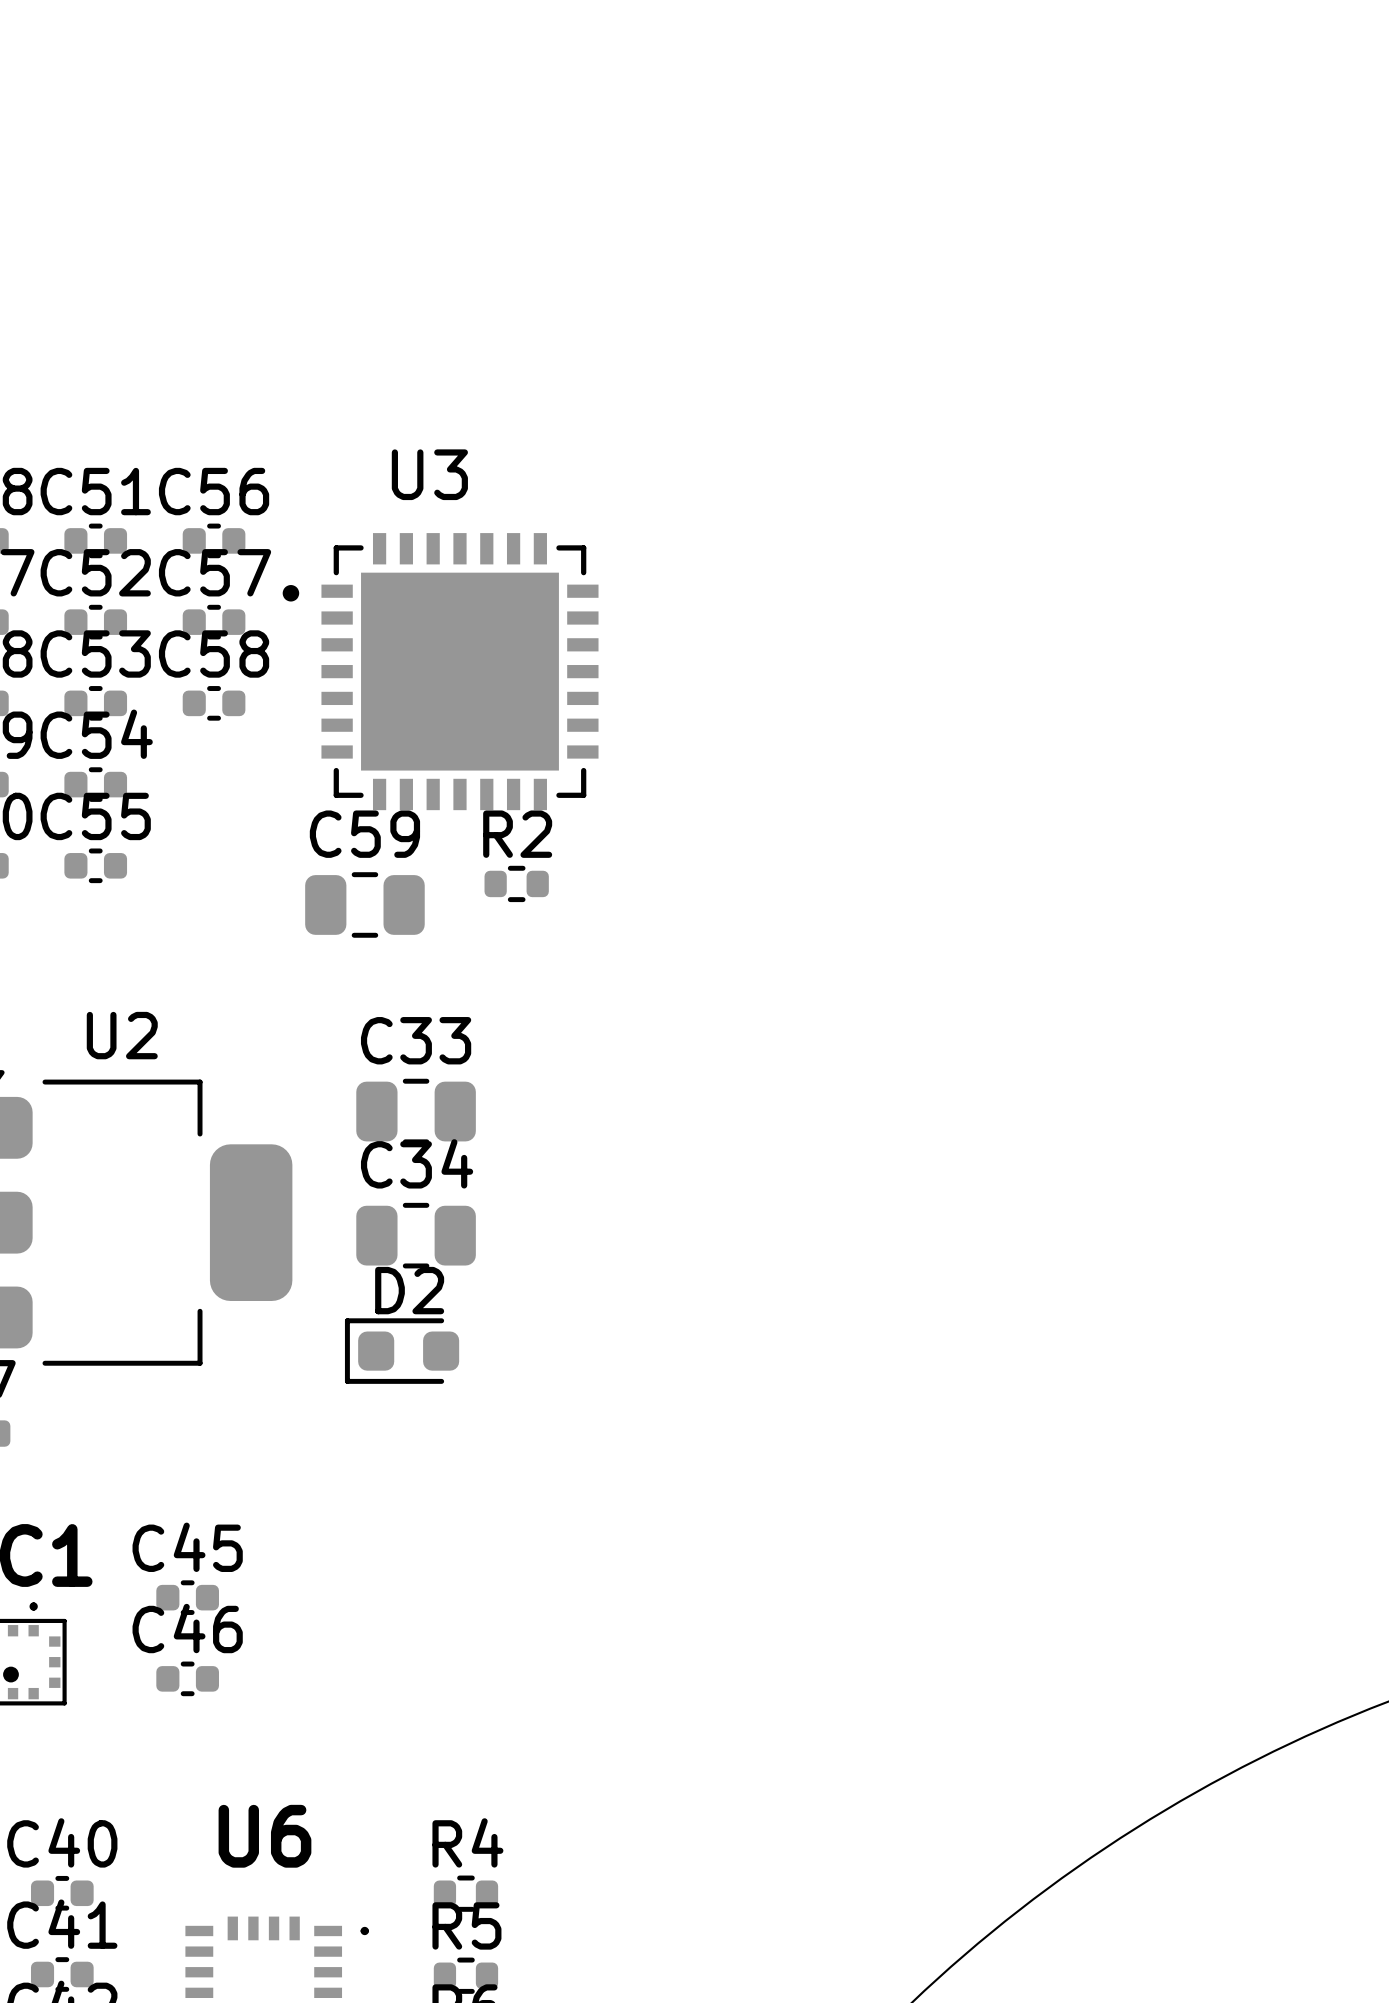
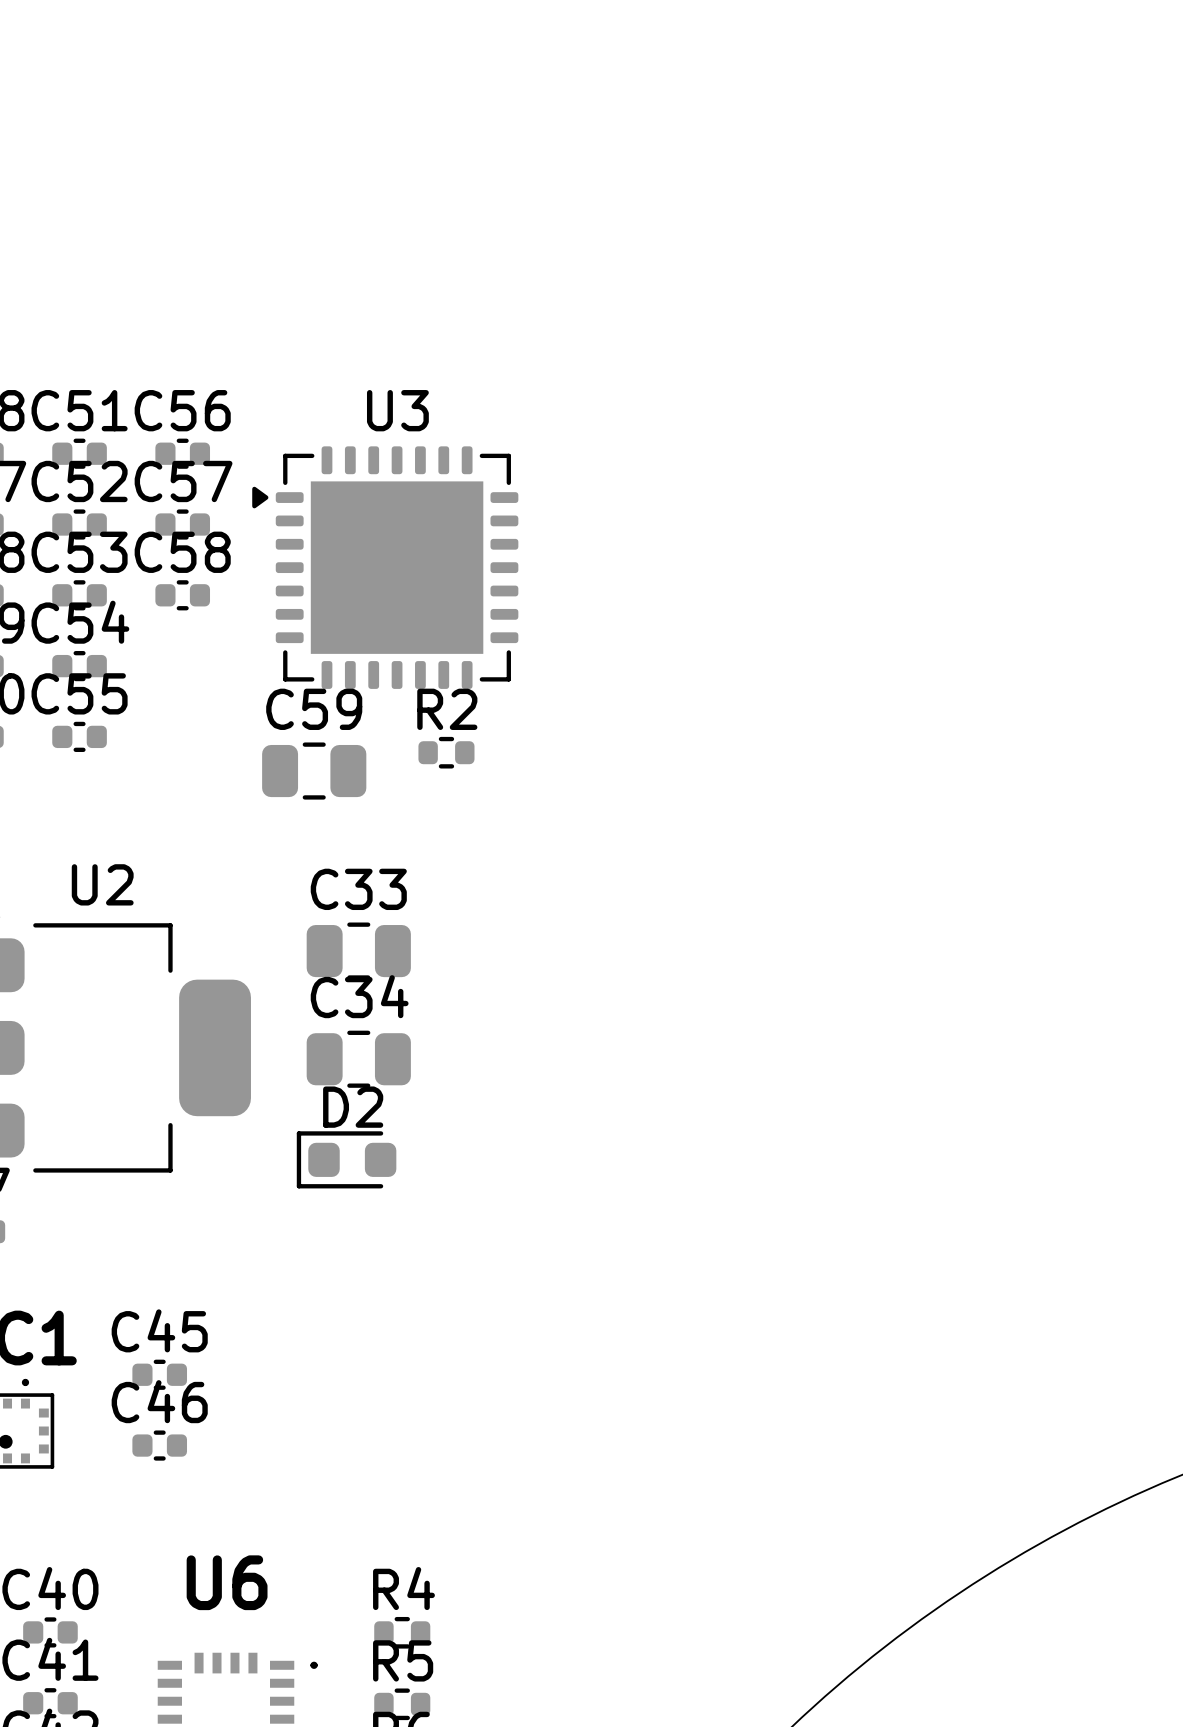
U3 name position: U3 (429, 474) -> U3 (397, 410)
U3 footprint: [282, 533, 599, 811] -> [252, 446, 519, 689]

